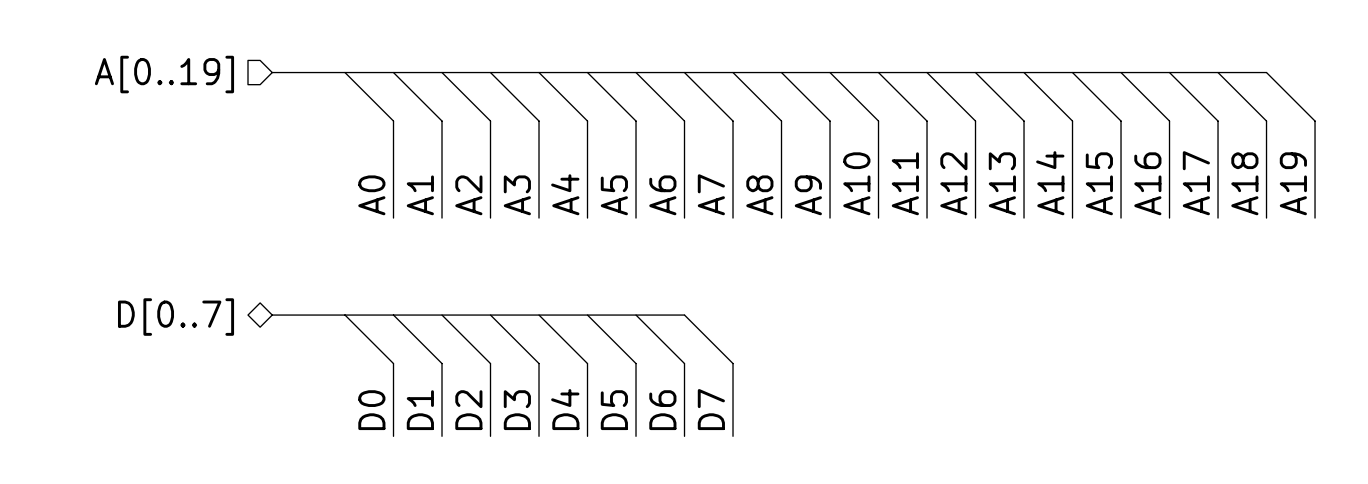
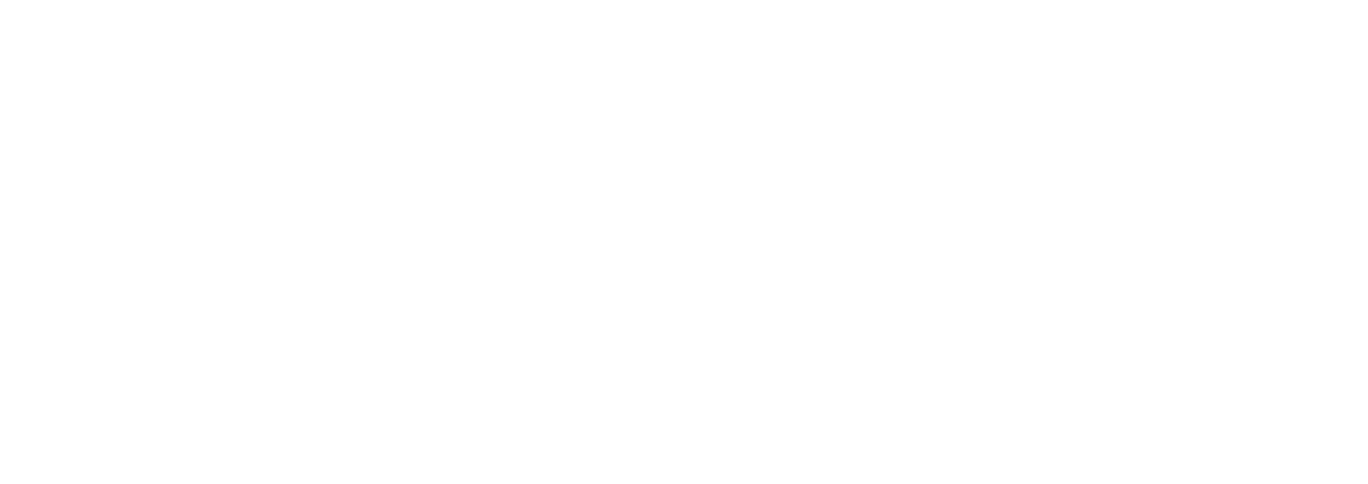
bus: (272, 72) (1266, 72) -> none
wire: (345, 72) (393, 121) (393, 218) -> none
wire: (393, 72) (442, 121) (442, 218) -> none
wire: (442, 72) (490, 121) (490, 218) -> none
wire: (490, 72) (539, 121) (539, 218) -> none
wire: (539, 72) (587, 121) (587, 218) -> none
wire: (587, 72) (636, 121) (636, 218) -> none
wire: (636, 72) (684, 121) (684, 218) -> none
wire: (684, 72) (733, 121) (733, 218) -> none
wire: (733, 72) (781, 121) (781, 218) -> none
wire: (781, 72) (830, 121) (830, 218) -> none
wire: (830, 72) (878, 121) (878, 218) -> none
wire: (878, 72) (927, 121) (927, 218) -> none
wire: (927, 72) (975, 121) (975, 218) -> none
wire: (975, 72) (1024, 121) (1024, 218) -> none
wire: (1024, 72) (1072, 121) (1072, 218) -> none
wire: (1072, 72) (1121, 121) (1121, 218) -> none
wire: (1121, 72) (1169, 121) (1169, 218) -> none
wire: (1169, 72) (1218, 121) (1218, 218) -> none
wire: (1218, 72) (1266, 121) (1266, 218) -> none
wire: (1266, 72) (1315, 121) (1315, 218) -> none
hierarchical label: A[0..19] (164, 74) -> none
label: A10 (856, 183) -> none
label: A11 (905, 183) -> none
label: A12 (953, 183) -> none
label: A13 (1002, 183) -> none
label: A14 (1050, 183) -> none
label: A15 (1099, 183) -> none
label: A16 (1147, 183) -> none
label: A17 (1196, 183) -> none
label: A18 (1244, 183) -> none
label: A19 (1293, 183) -> none
label: A4 (565, 194) -> none
label: A7 (711, 194) -> none
label: A0 (371, 195) -> none
label: A1 (420, 195) -> none
label: A2 (468, 195) -> none
label: A3 (517, 195) -> none
label: A5 (614, 195) -> none
label: A6 (662, 195) -> none
label: A8 (759, 195) -> none
label: A9 (808, 195) -> none
bus: (272, 315) (684, 315) -> none
wire: (345, 315) (393, 363) (393, 436) -> none
wire: (393, 315) (442, 363) (442, 436) -> none
wire: (442, 315) (490, 363) (490, 436) -> none
wire: (490, 315) (539, 363) (539, 436) -> none
wire: (539, 315) (587, 363) (587, 436) -> none
wire: (587, 315) (636, 363) (636, 436) -> none
wire: (636, 315) (684, 363) (684, 436) -> none
wire: (684, 315) (733, 363) (733, 436) -> none
hierarchical label: D[0..7] (176, 317) -> none
label: D4 (565, 409) -> none
label: D7 (711, 409) -> none
label: D0 (371, 410) -> none
label: D1 (420, 410) -> none
label: D2 (468, 410) -> none
label: D3 (517, 410) -> none
label: D5 (614, 410) -> none
label: D6 (662, 410) -> none

